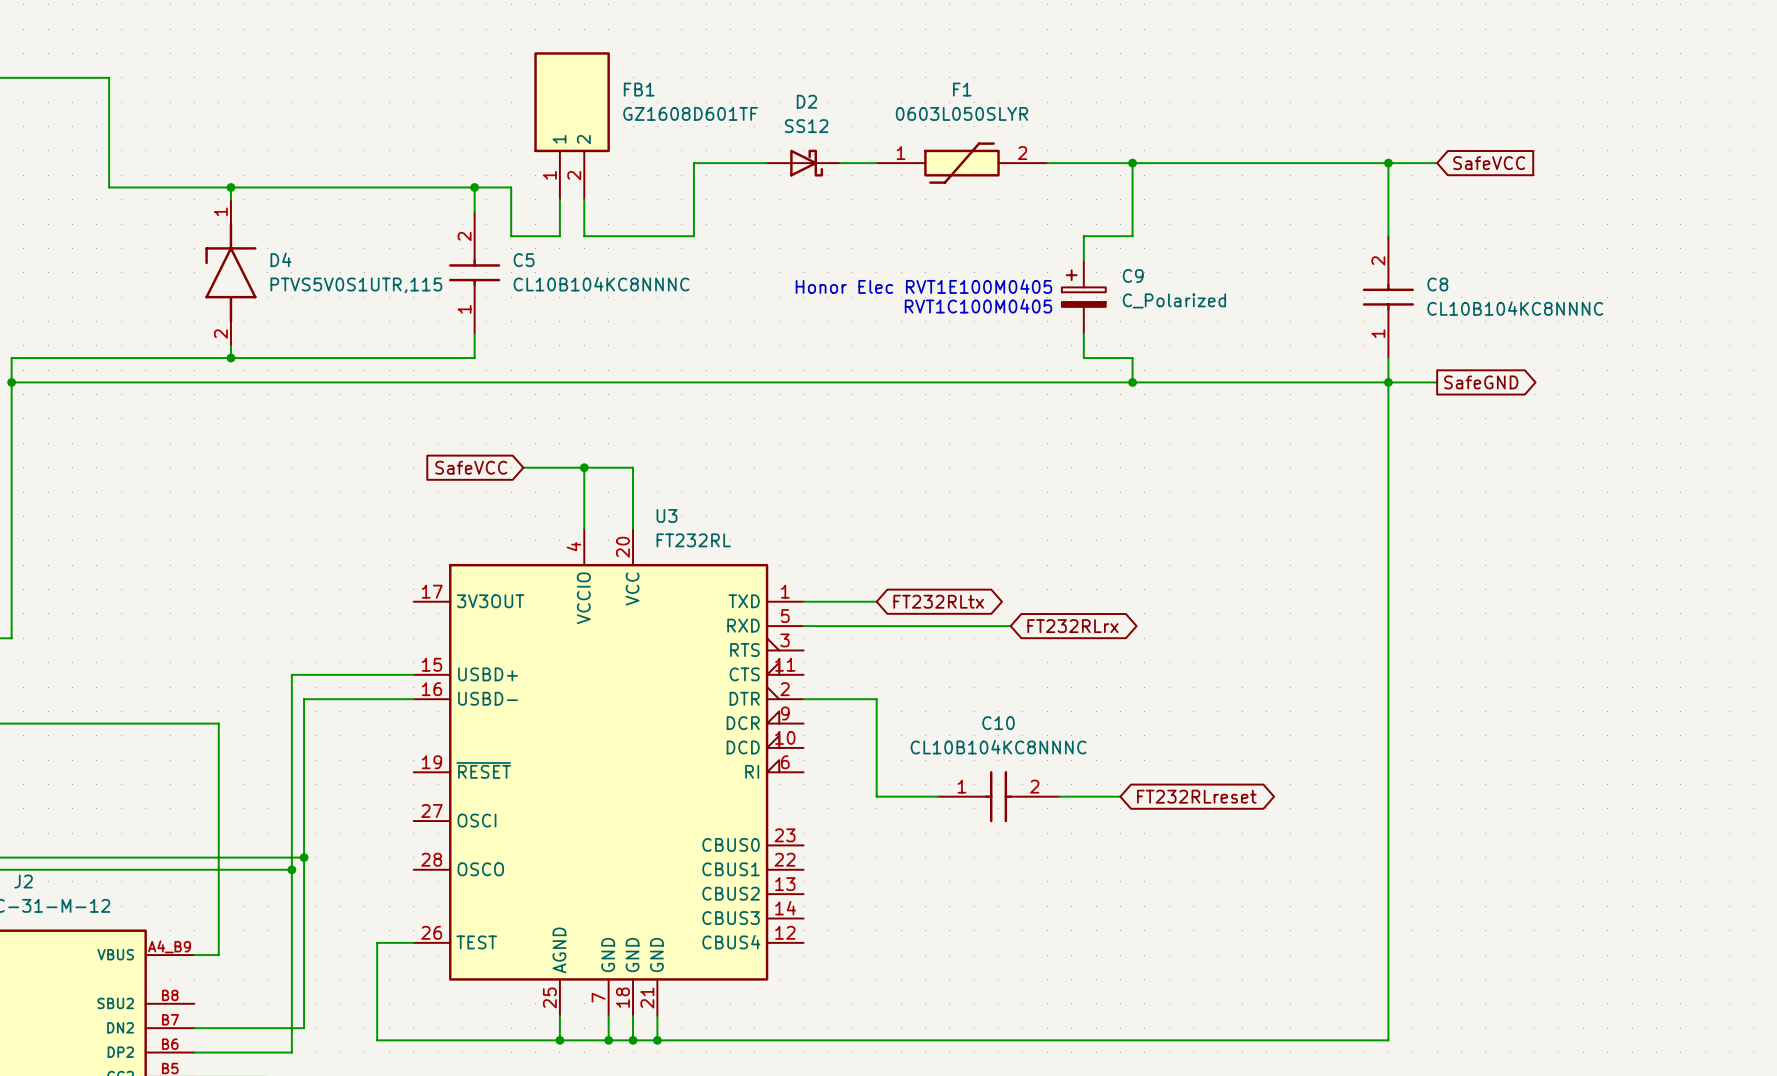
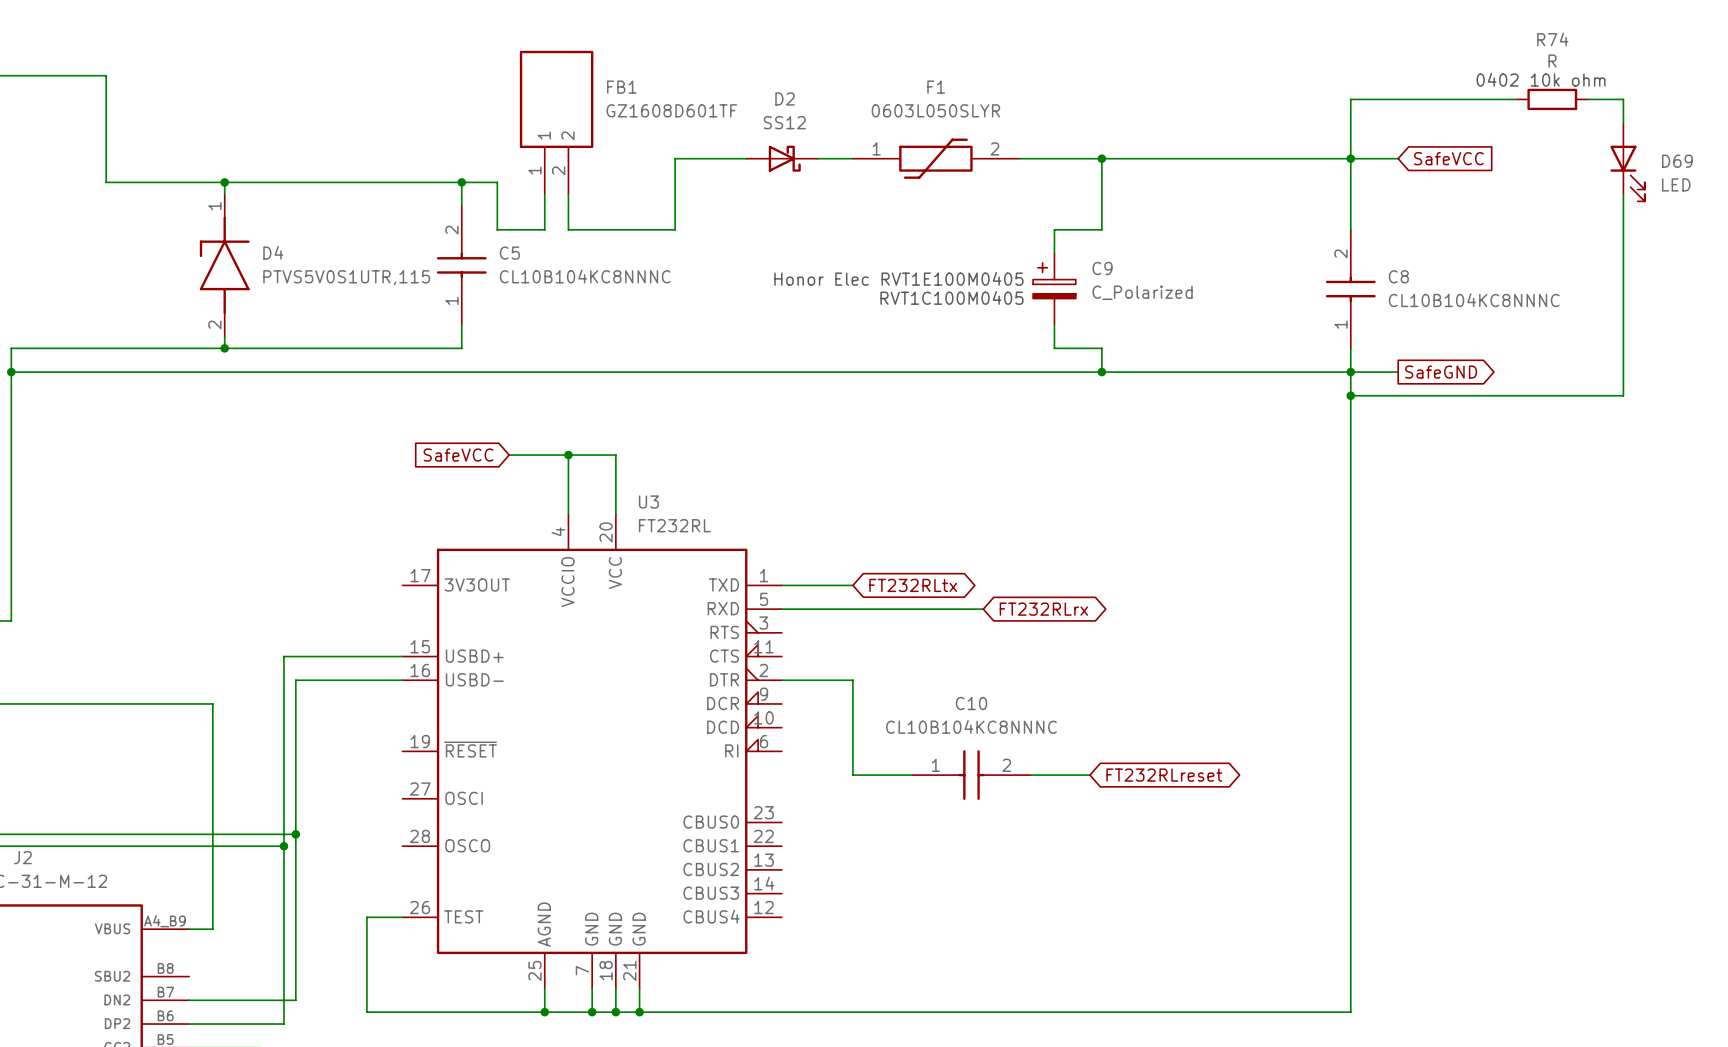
text: none -> 0402 10k ohm (1541, 79)
wire: none -> (1516, 99) (1350, 99) (1350, 158)
R74: none -> R (1552, 99)
wire: none -> (1587, 99) (1623, 99) (1623, 123)
D69: none -> LED (1627, 162)
wire: none -> (1623, 194) (1623, 395) (1350, 395)
junction: none -> (1350, 395)

